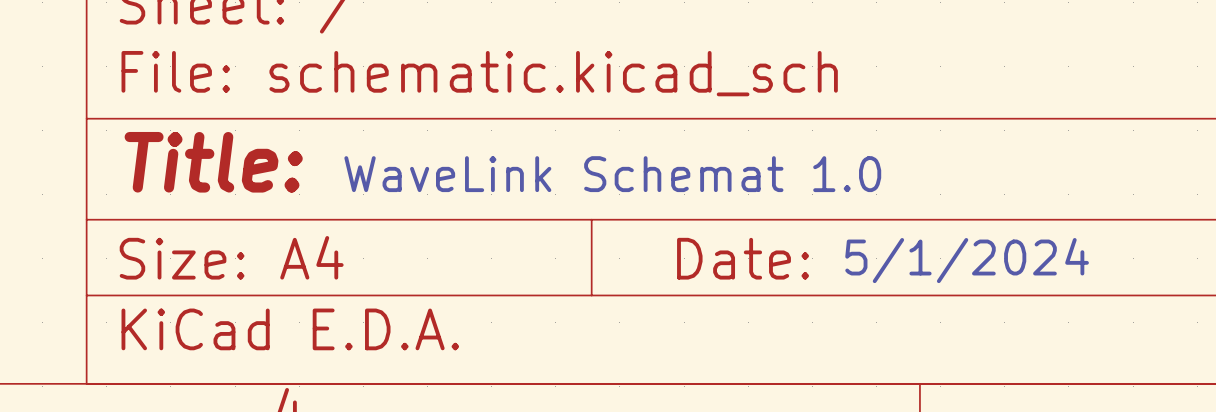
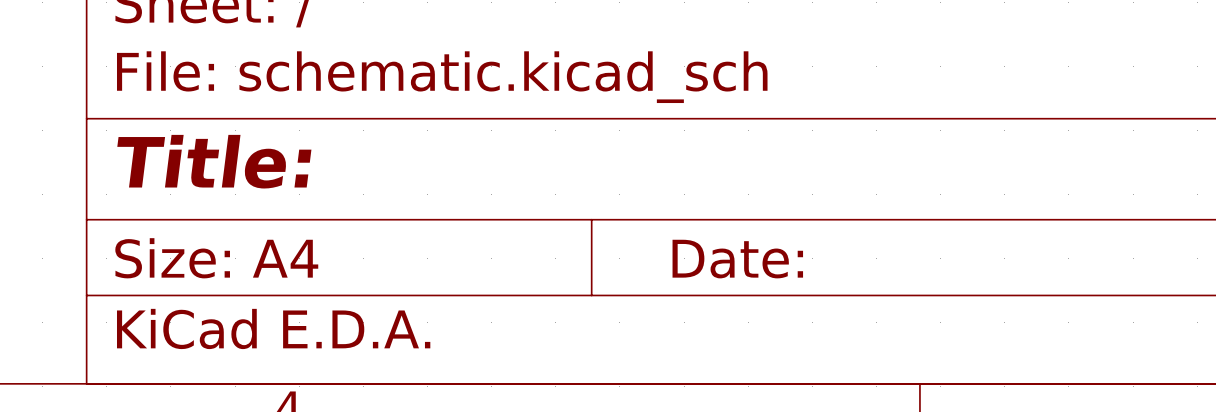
text: WaveLink Schemat 1.0 (612, 174) -> none
text: 5/1/2024 (967, 260) -> none

